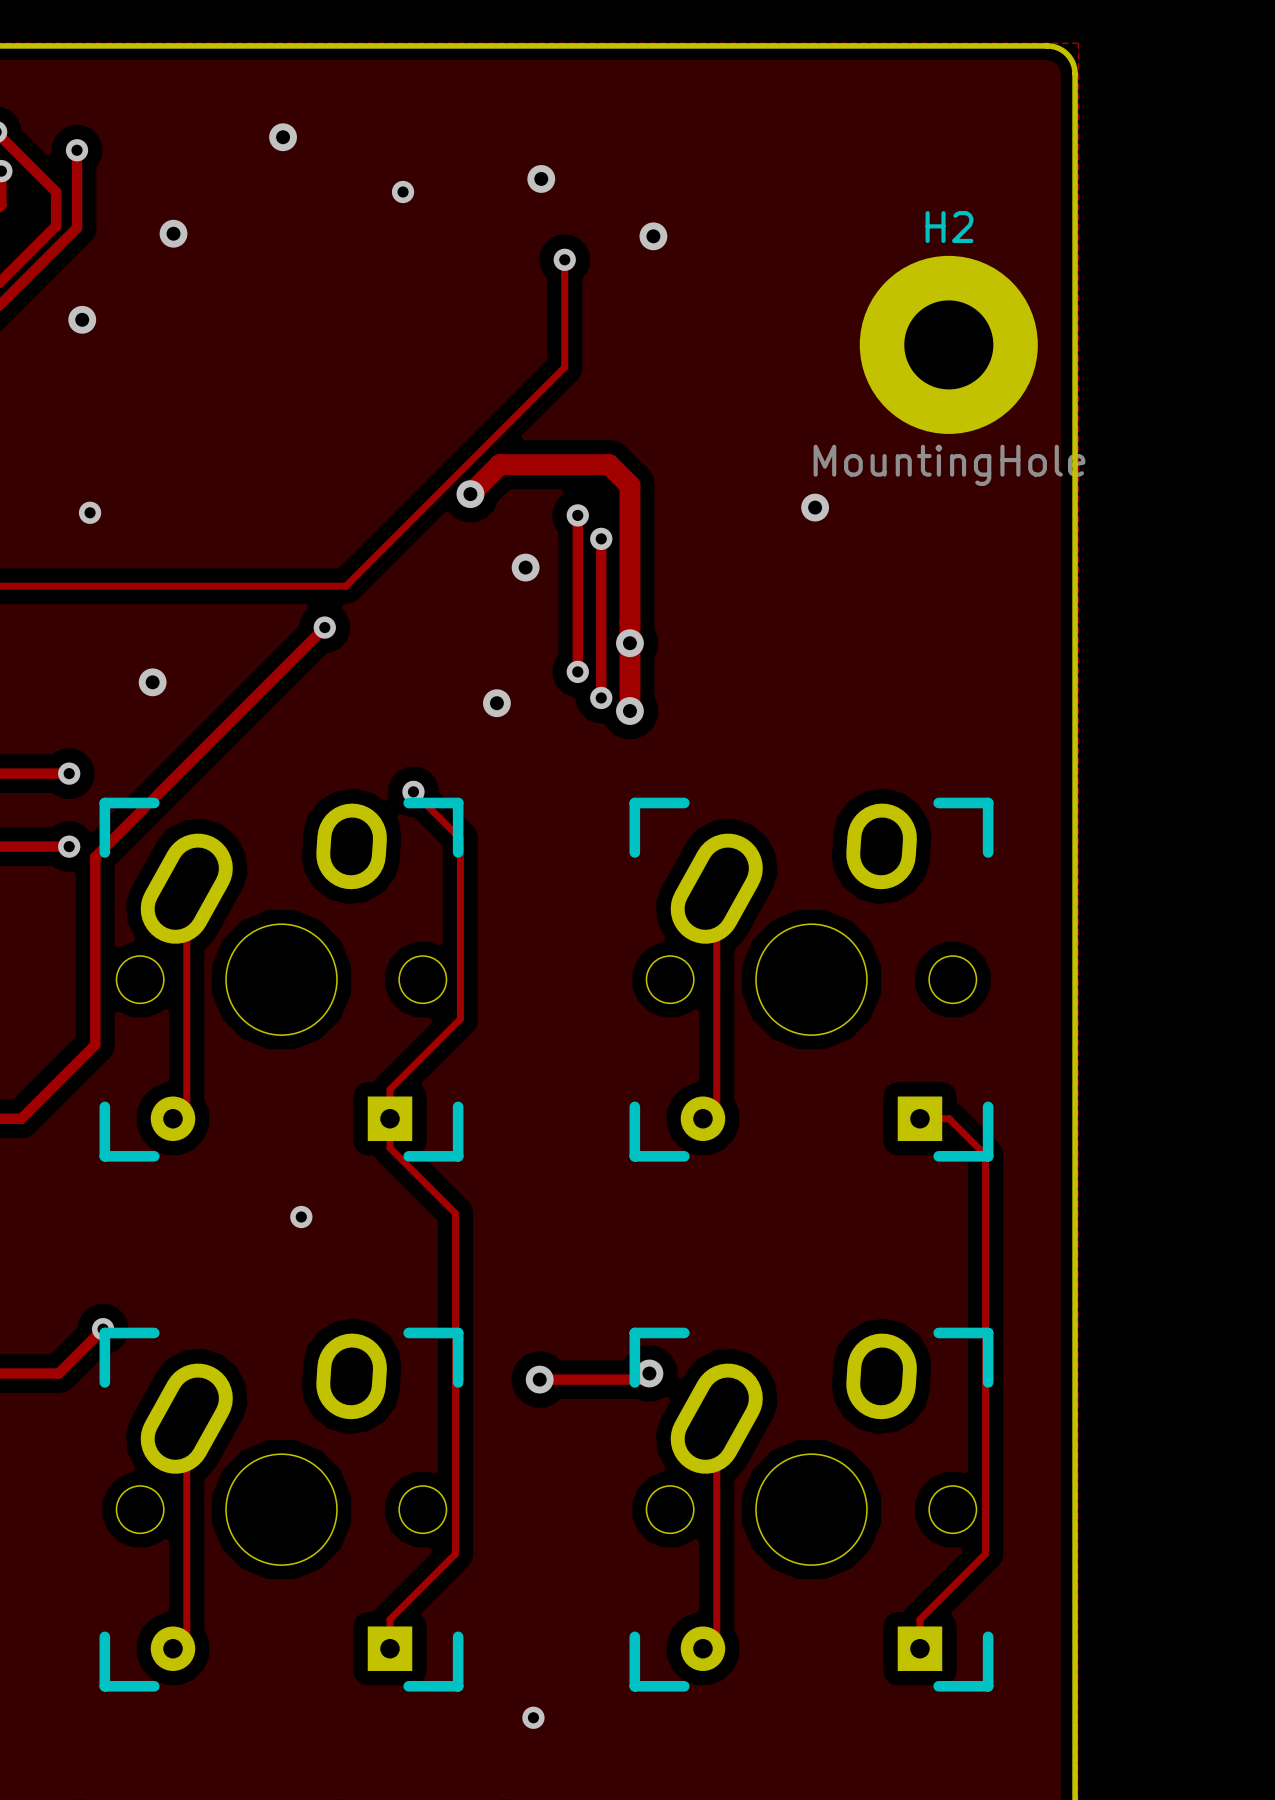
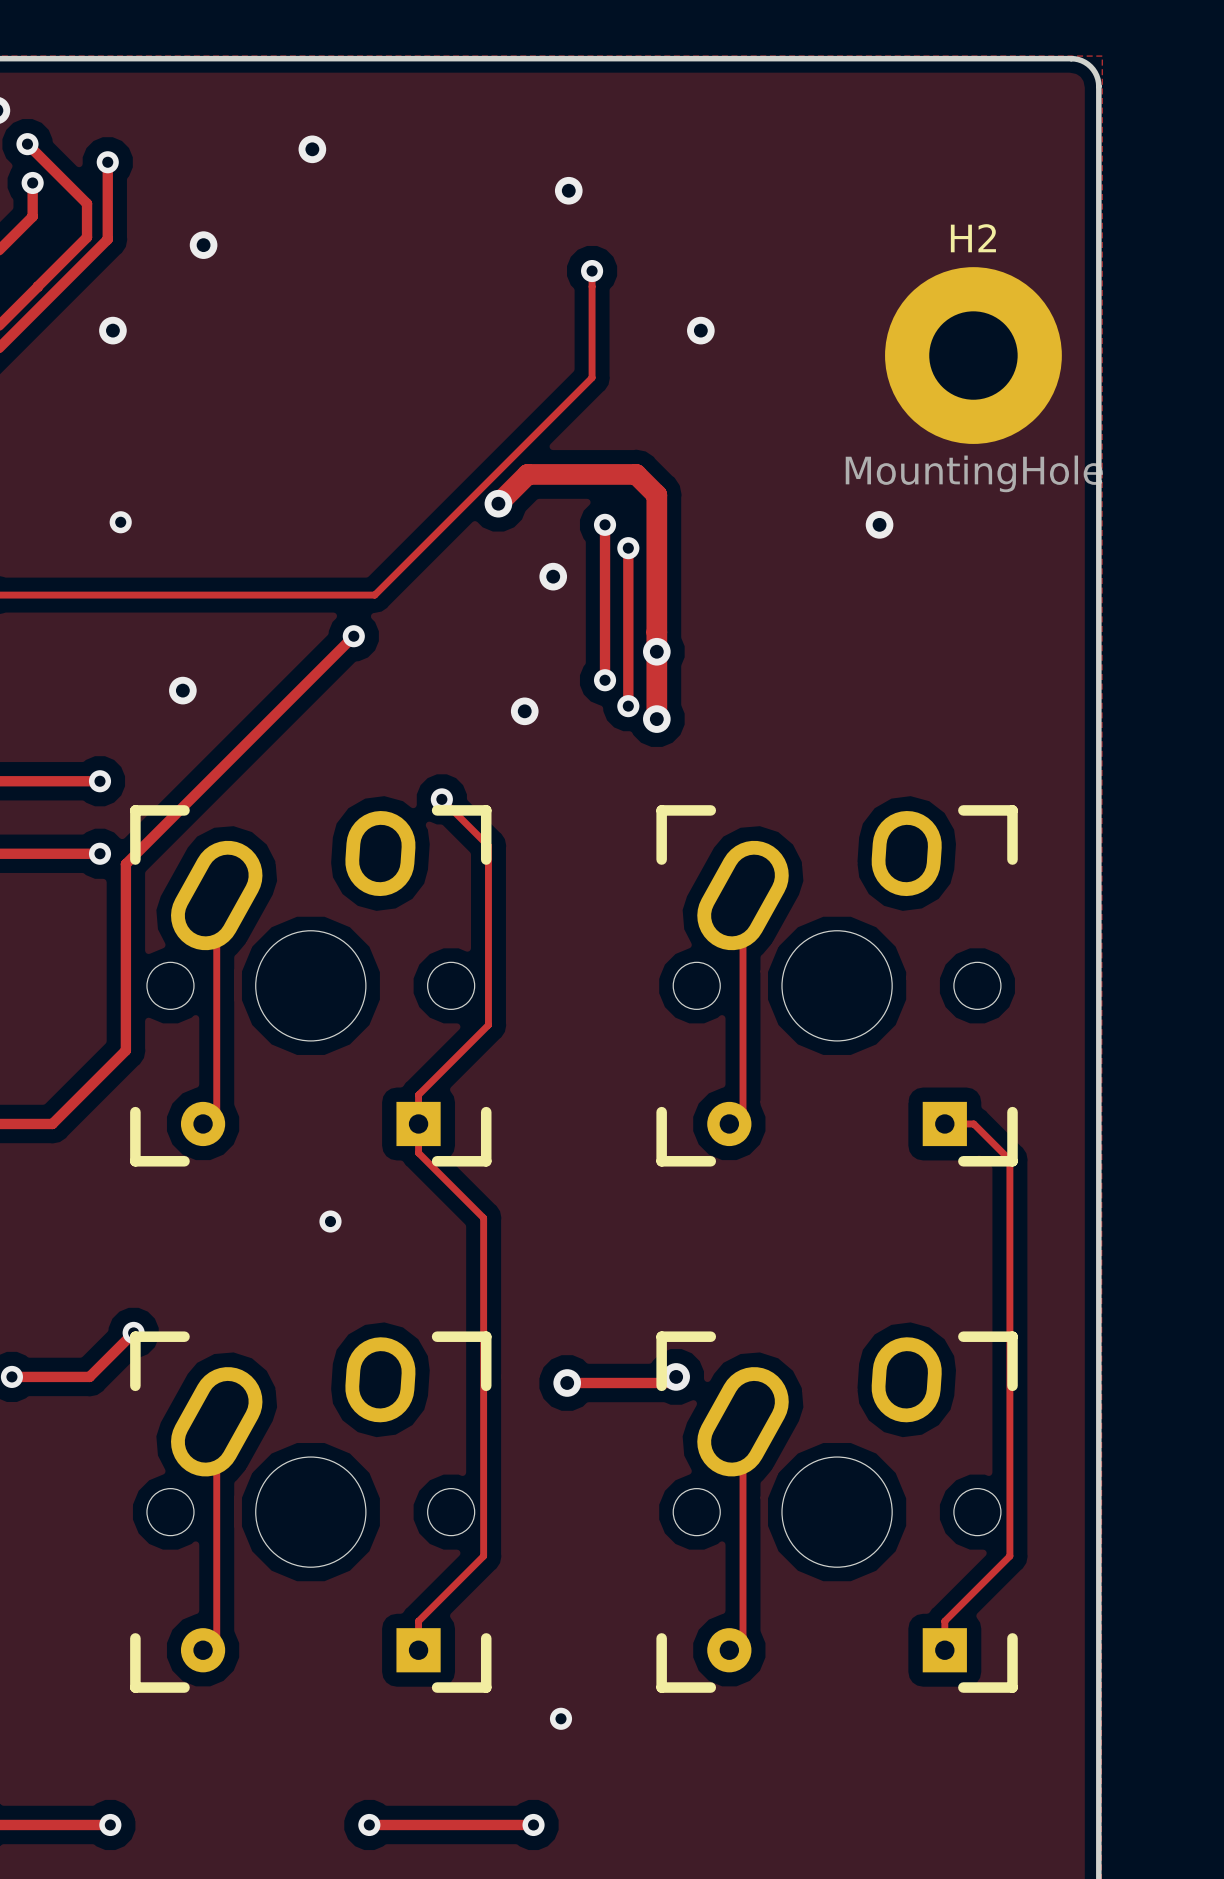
via: (403, 191) -> none
via position: (653, 236) -> (700, 330)
via position: (815, 507) -> (879, 524)

